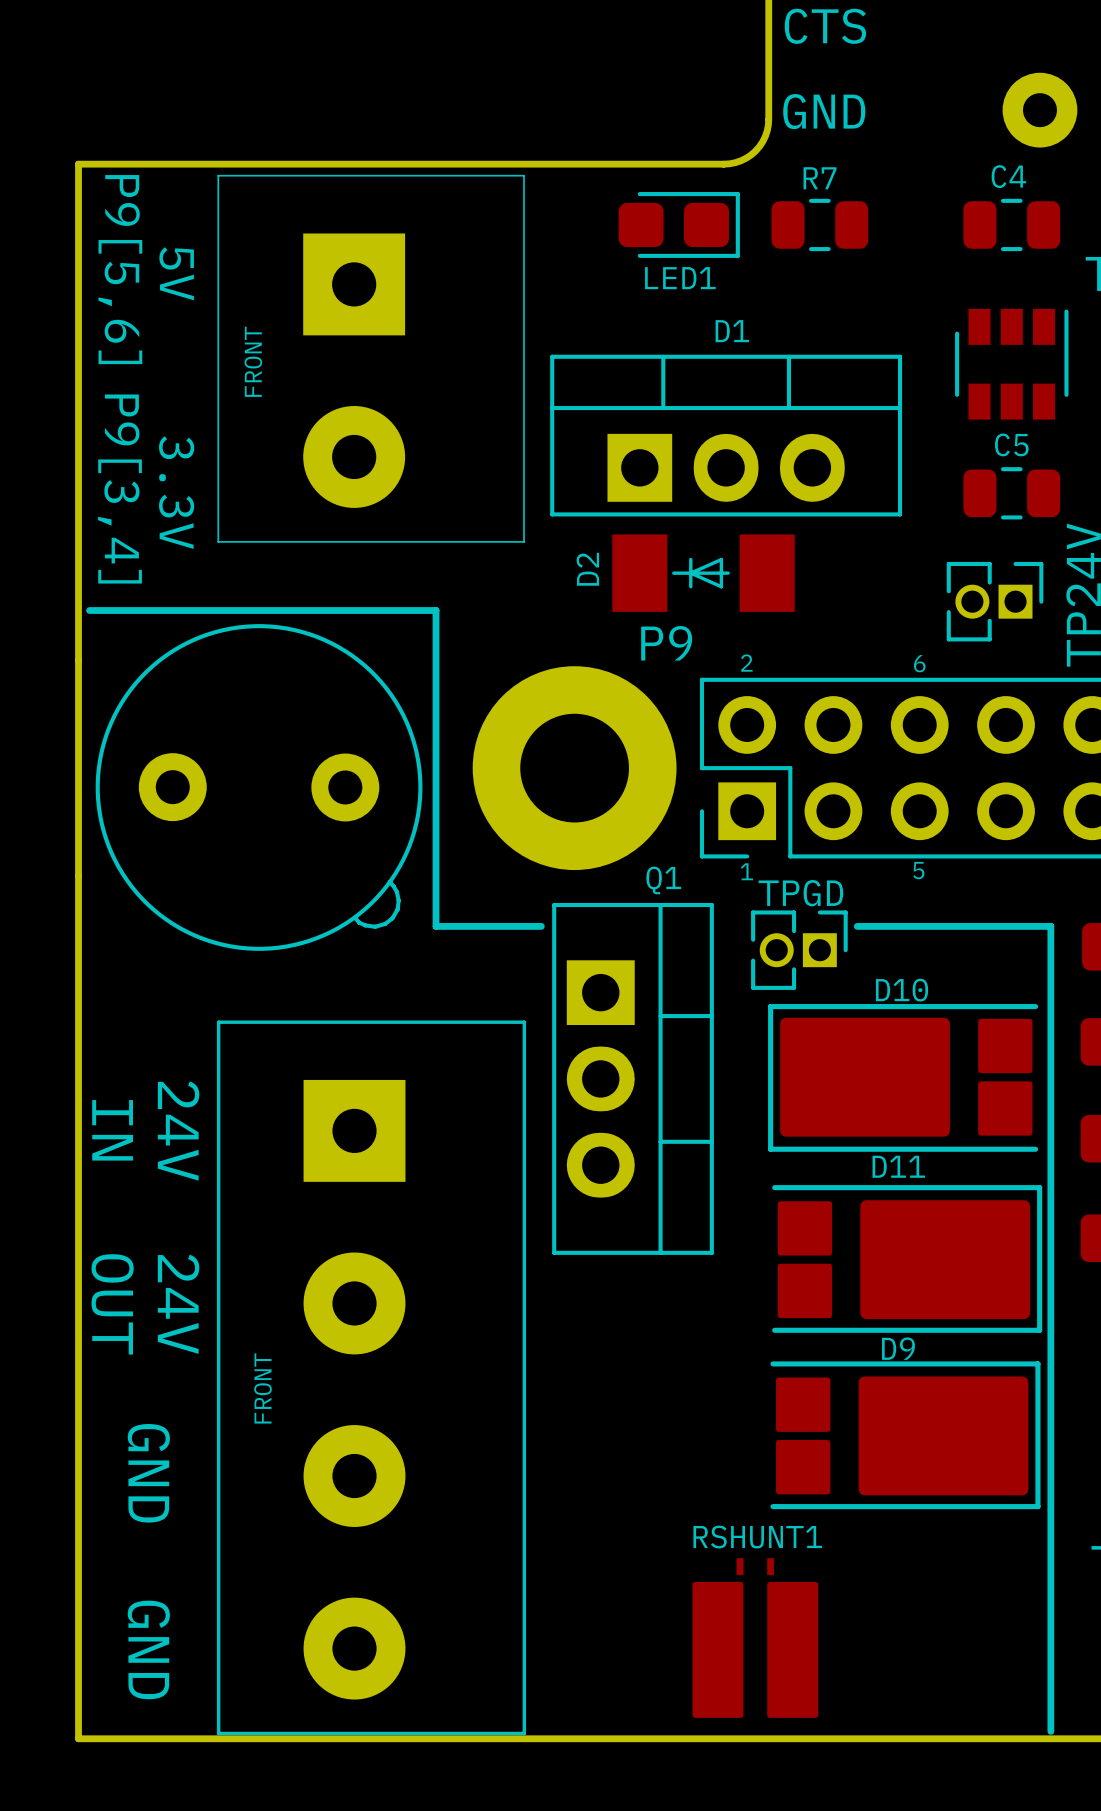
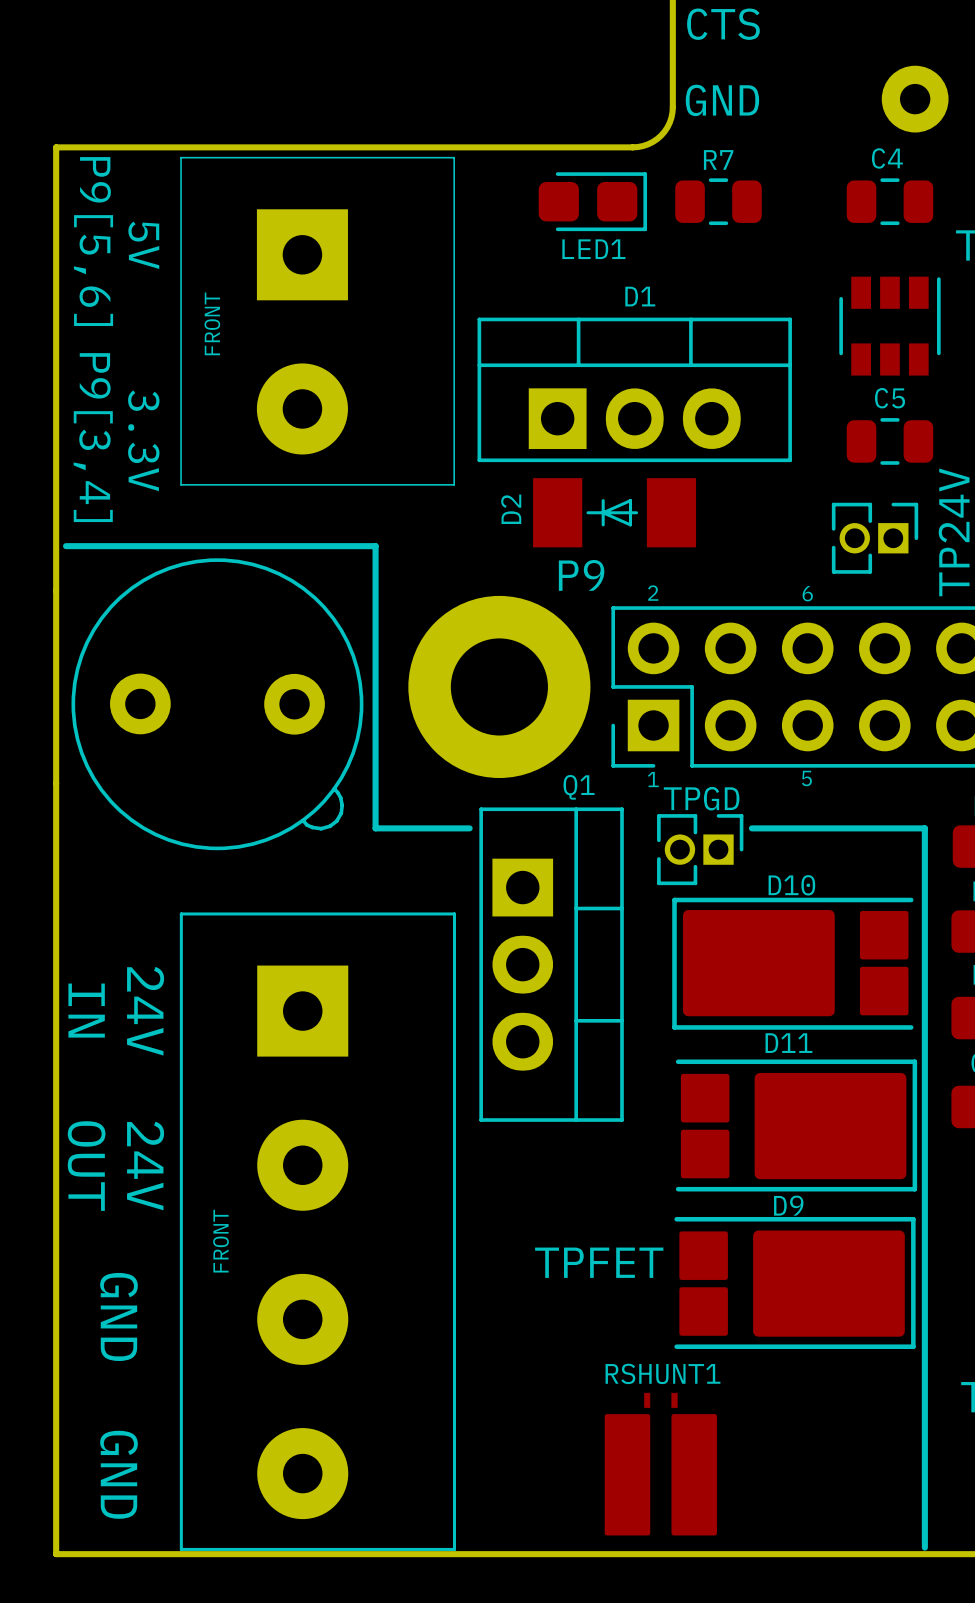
text: none -> TPFET (599, 1262)

